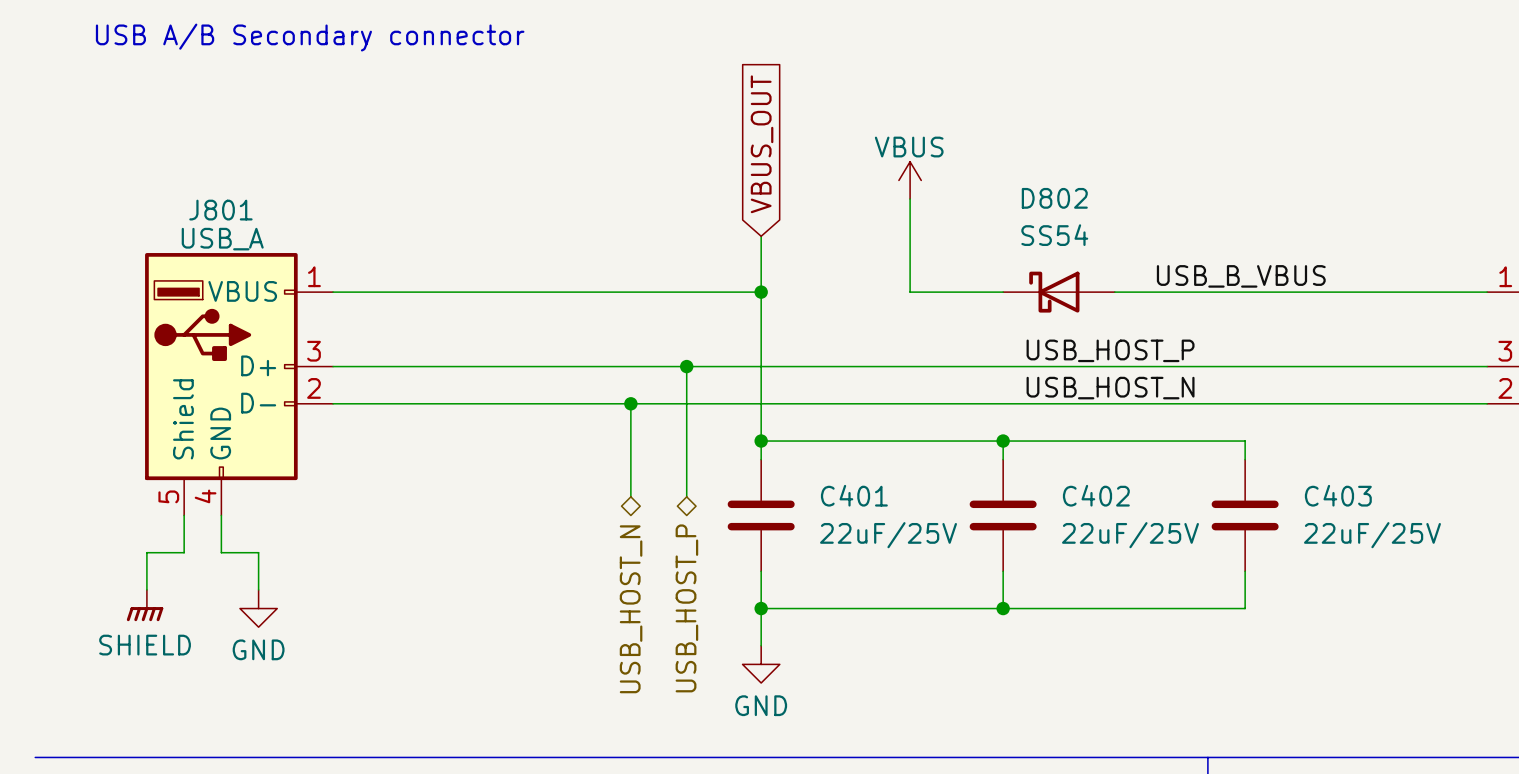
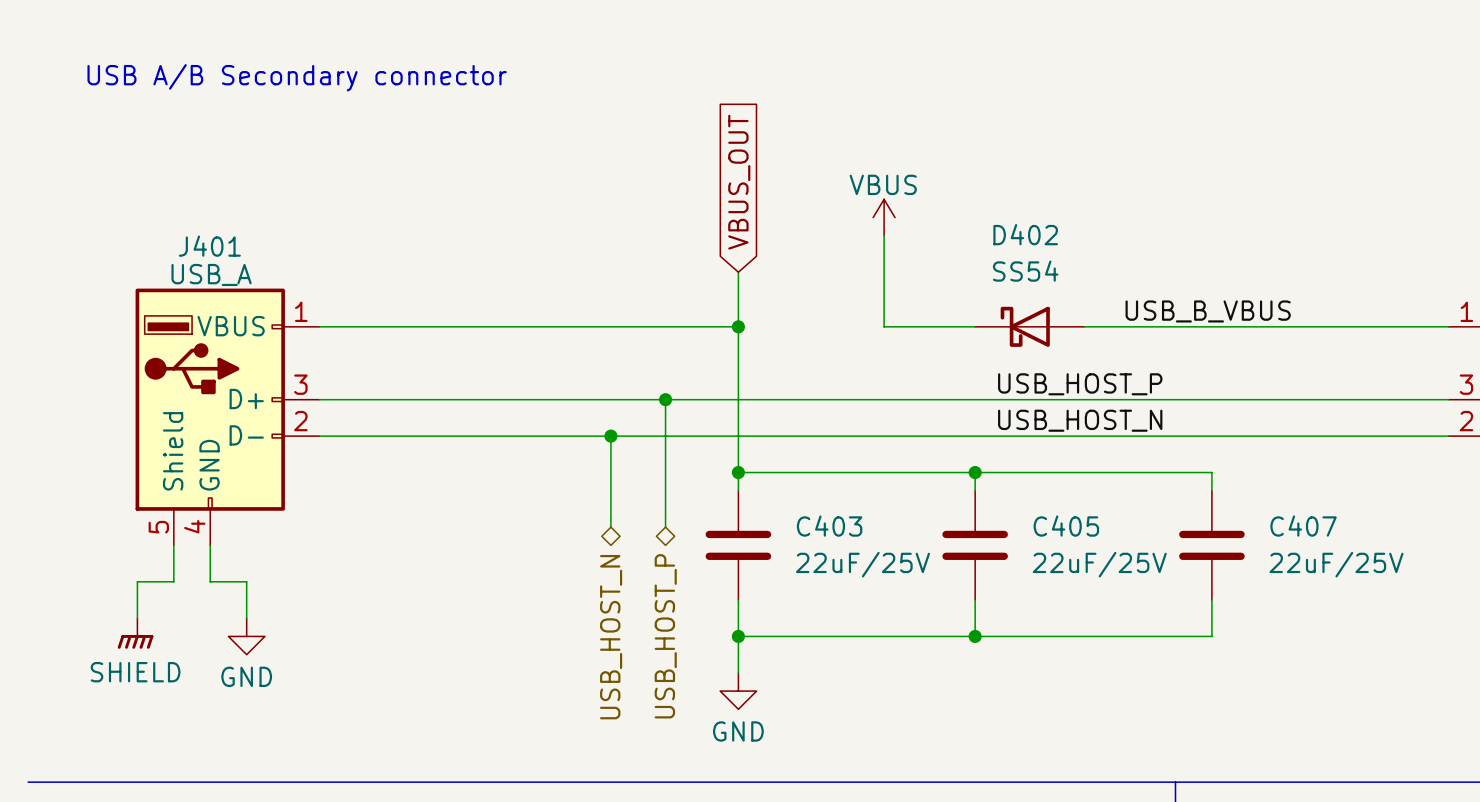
D802 name: D802 (1054, 198) -> D402 (1025, 234)
J801 name: J801 (220, 210) -> J401 (209, 246)
C401 name: C401 (854, 495) -> C403 (829, 526)
C402 name: C402 (1096, 495) -> C405 (1066, 526)
C403 name: C403 (1338, 495) -> C407 (1303, 526)

